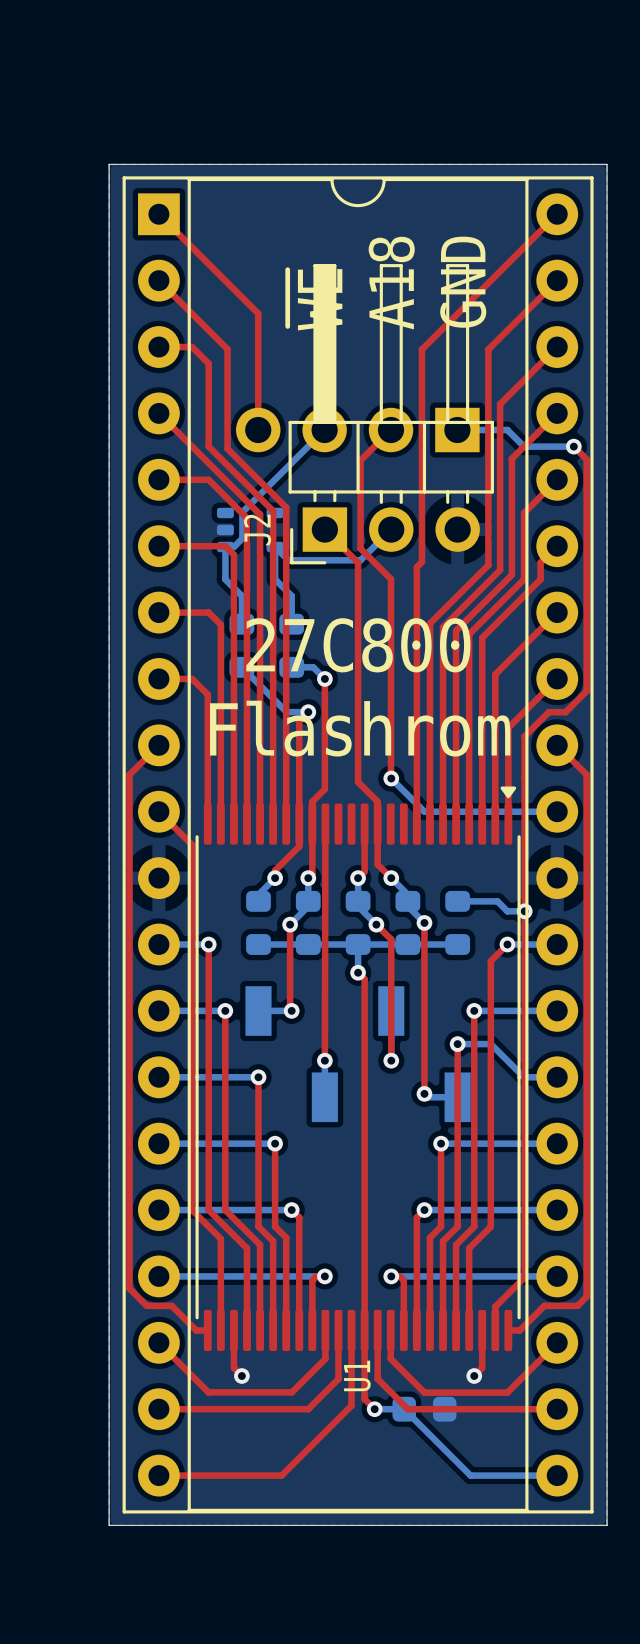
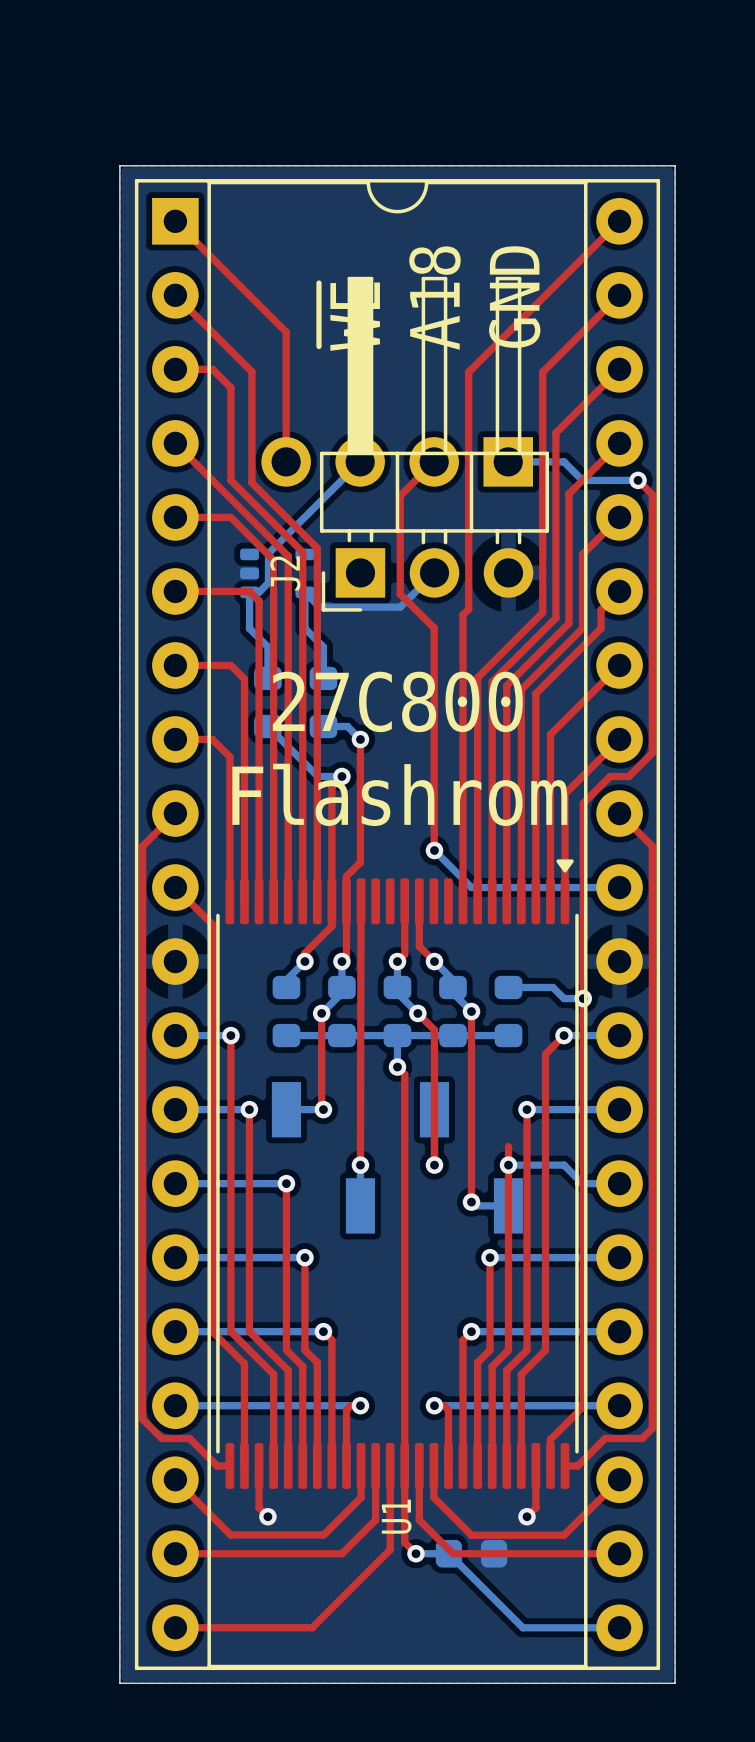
top track: (324, 529) (358, 562) (358, 782) (377, 801) (377, 824) -> none
bottom track: (457, 1044) (490, 1044) (507, 1060) -> (508, 1165) (564, 1165)
via position: (457, 1044) -> (508, 1165)

